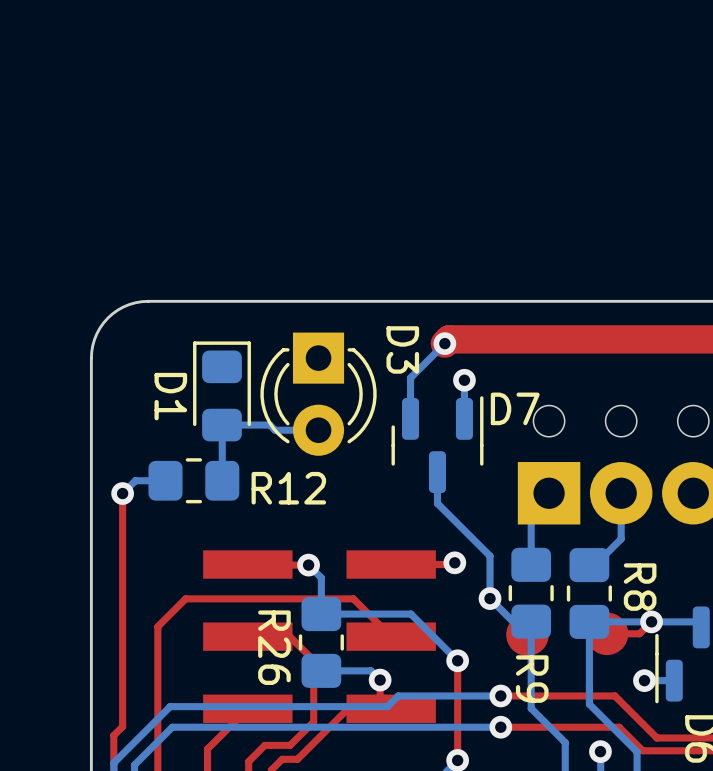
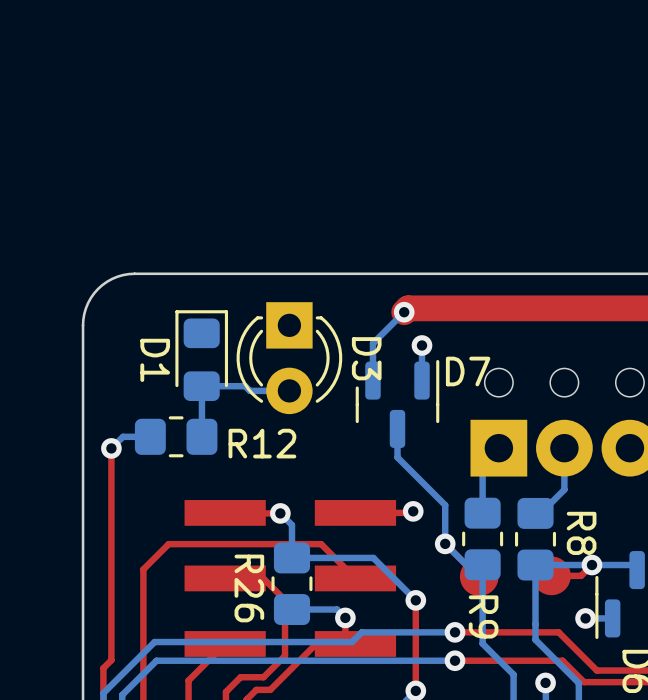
D3 name position: D3 (402, 349) -> D3 (366, 358)

